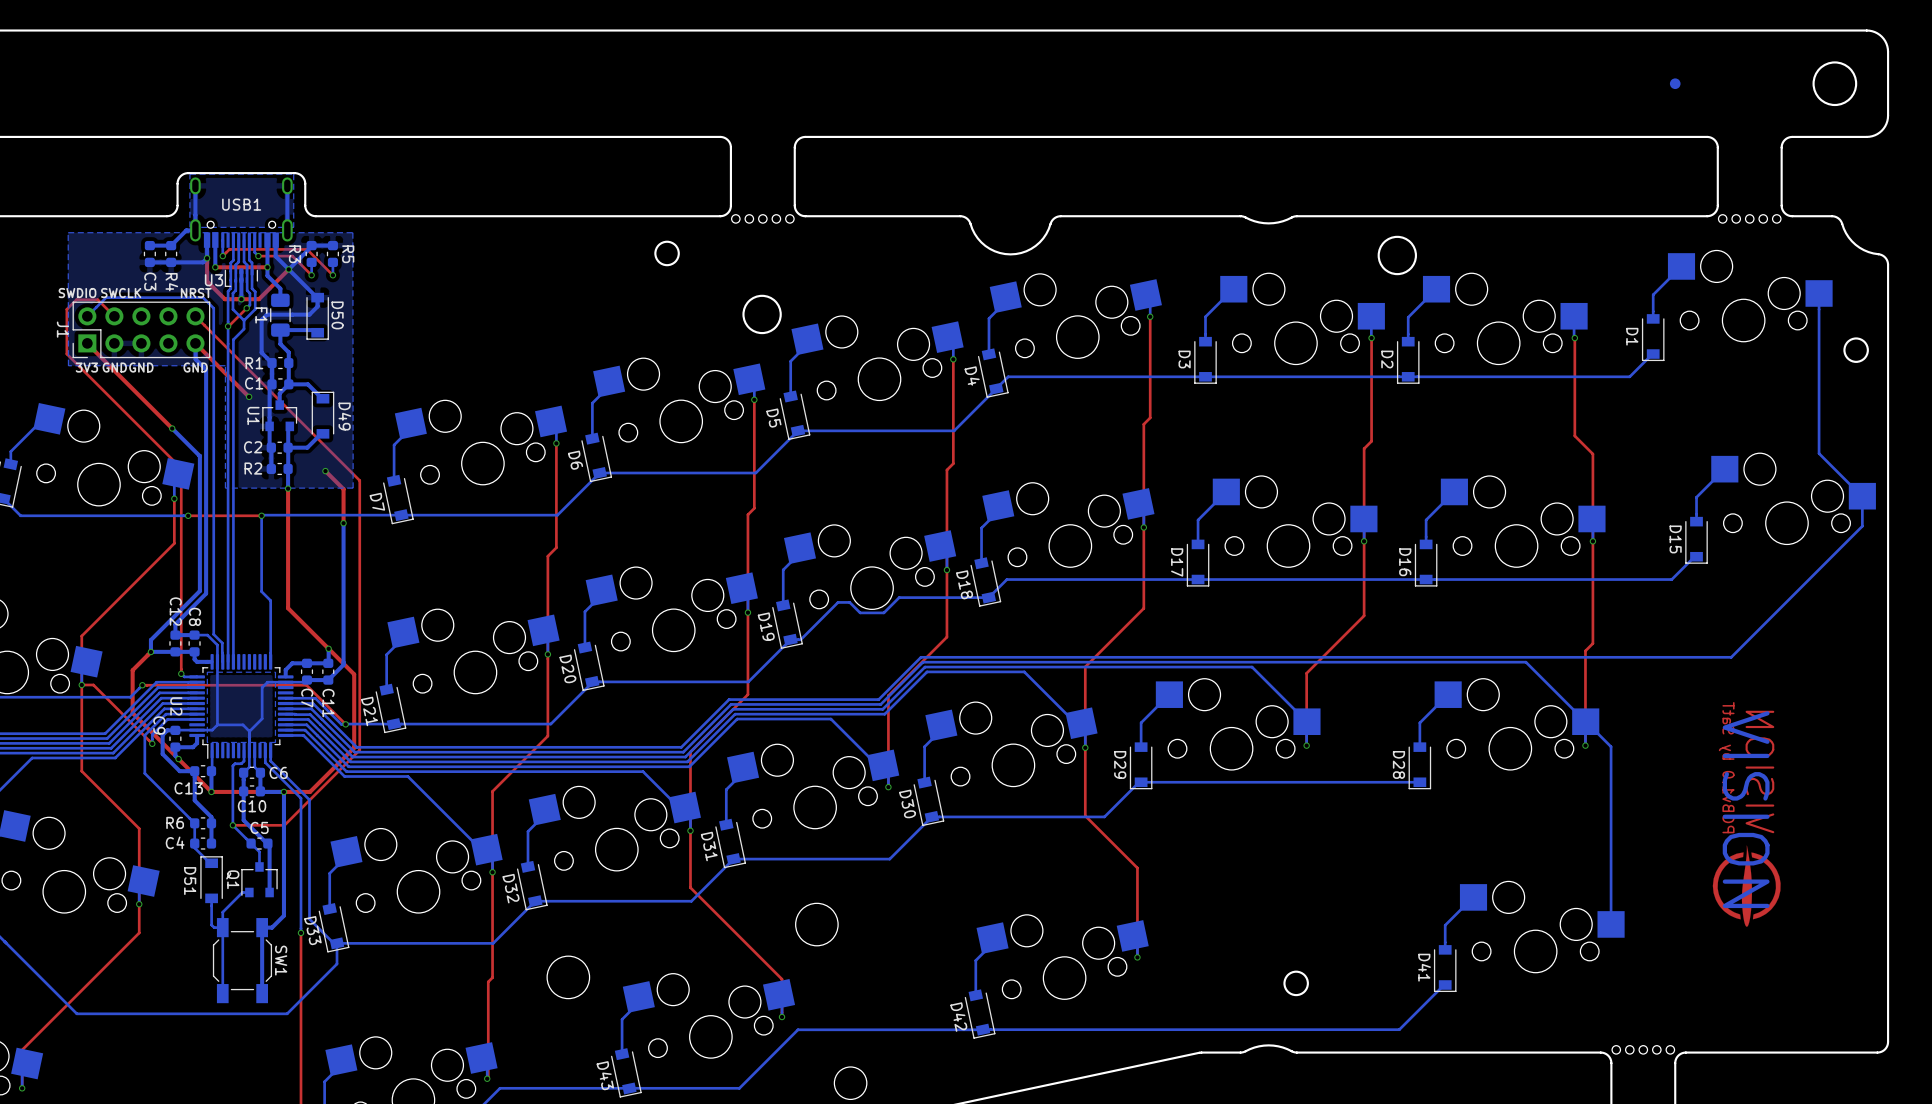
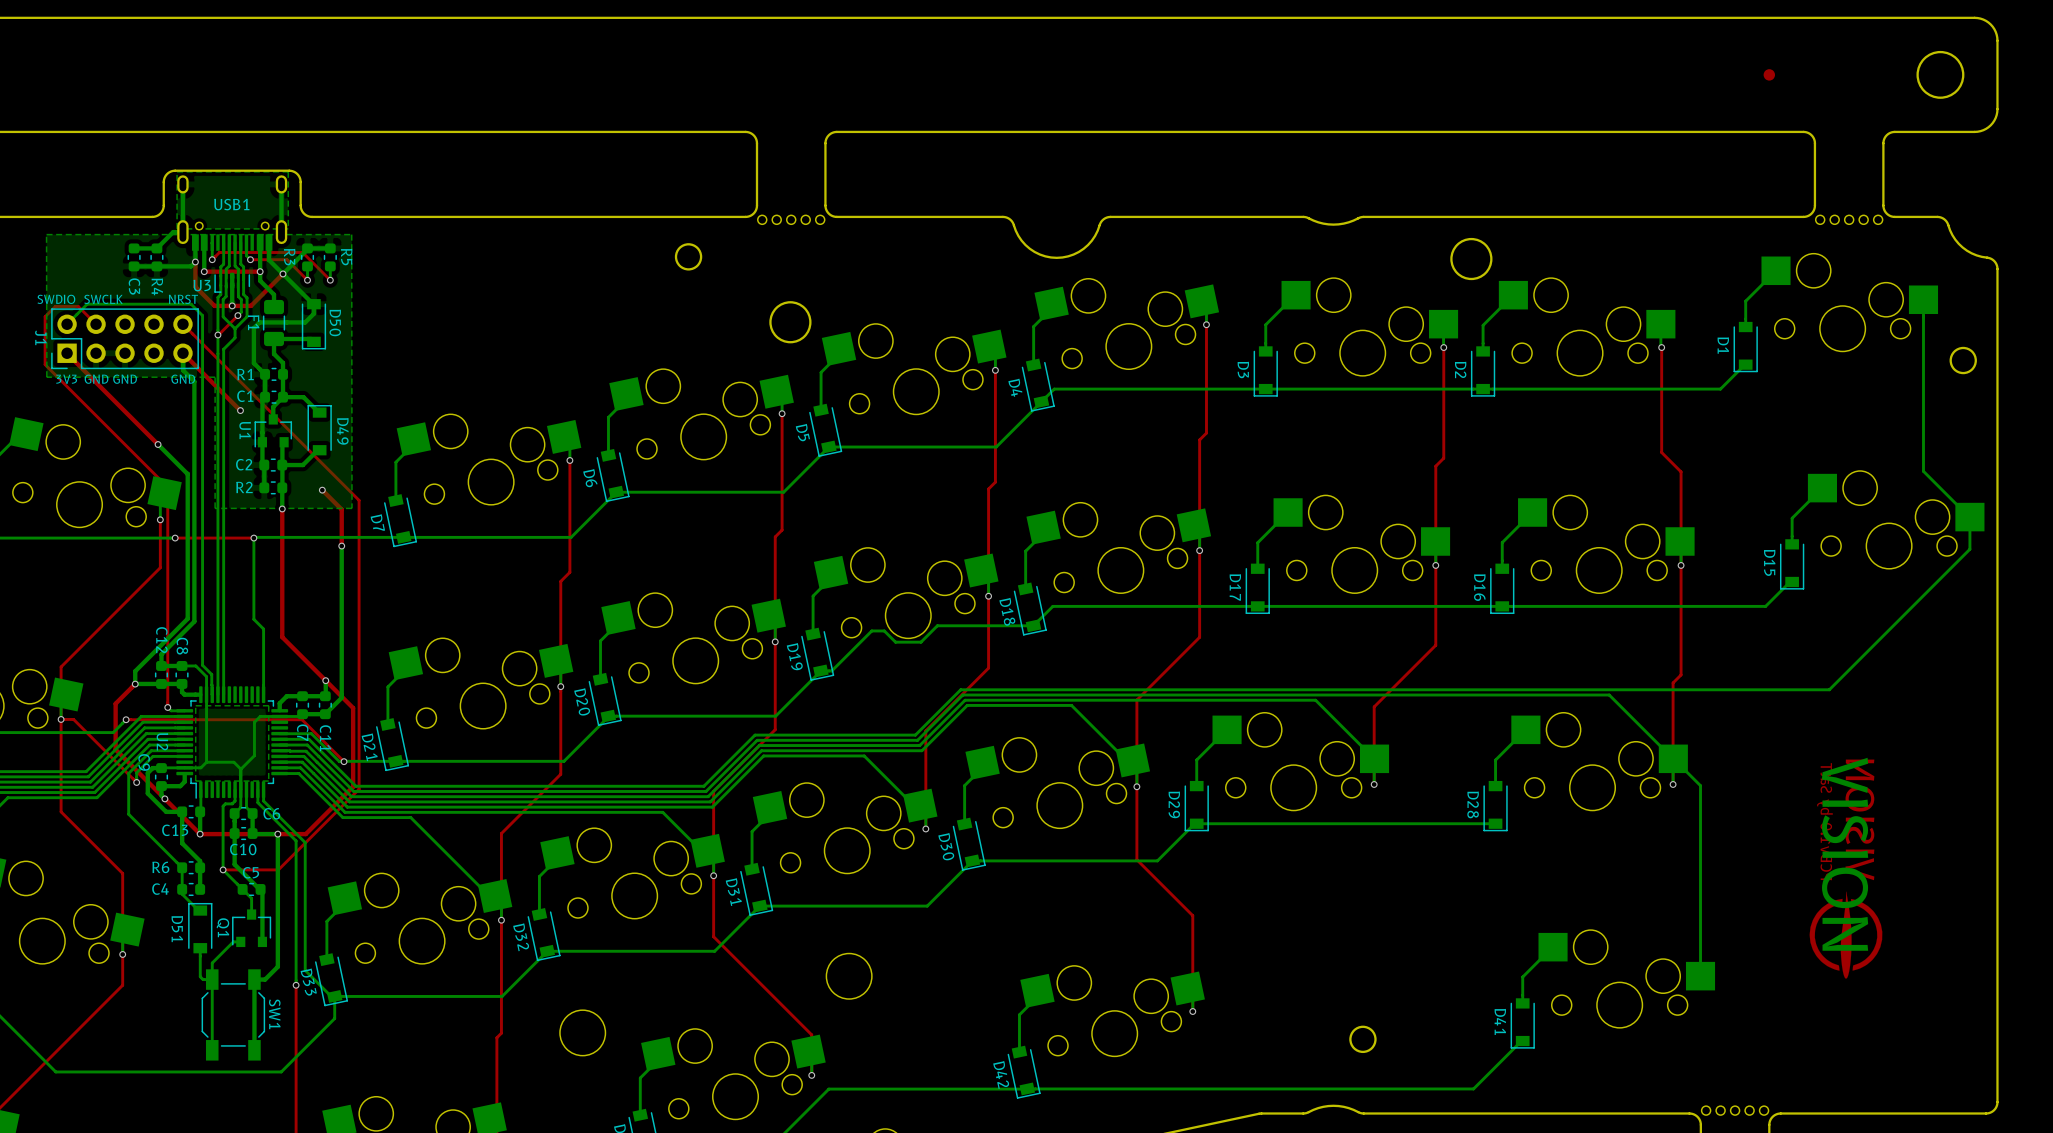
part side: bottom (1675, 83) -> top (1769, 74)

